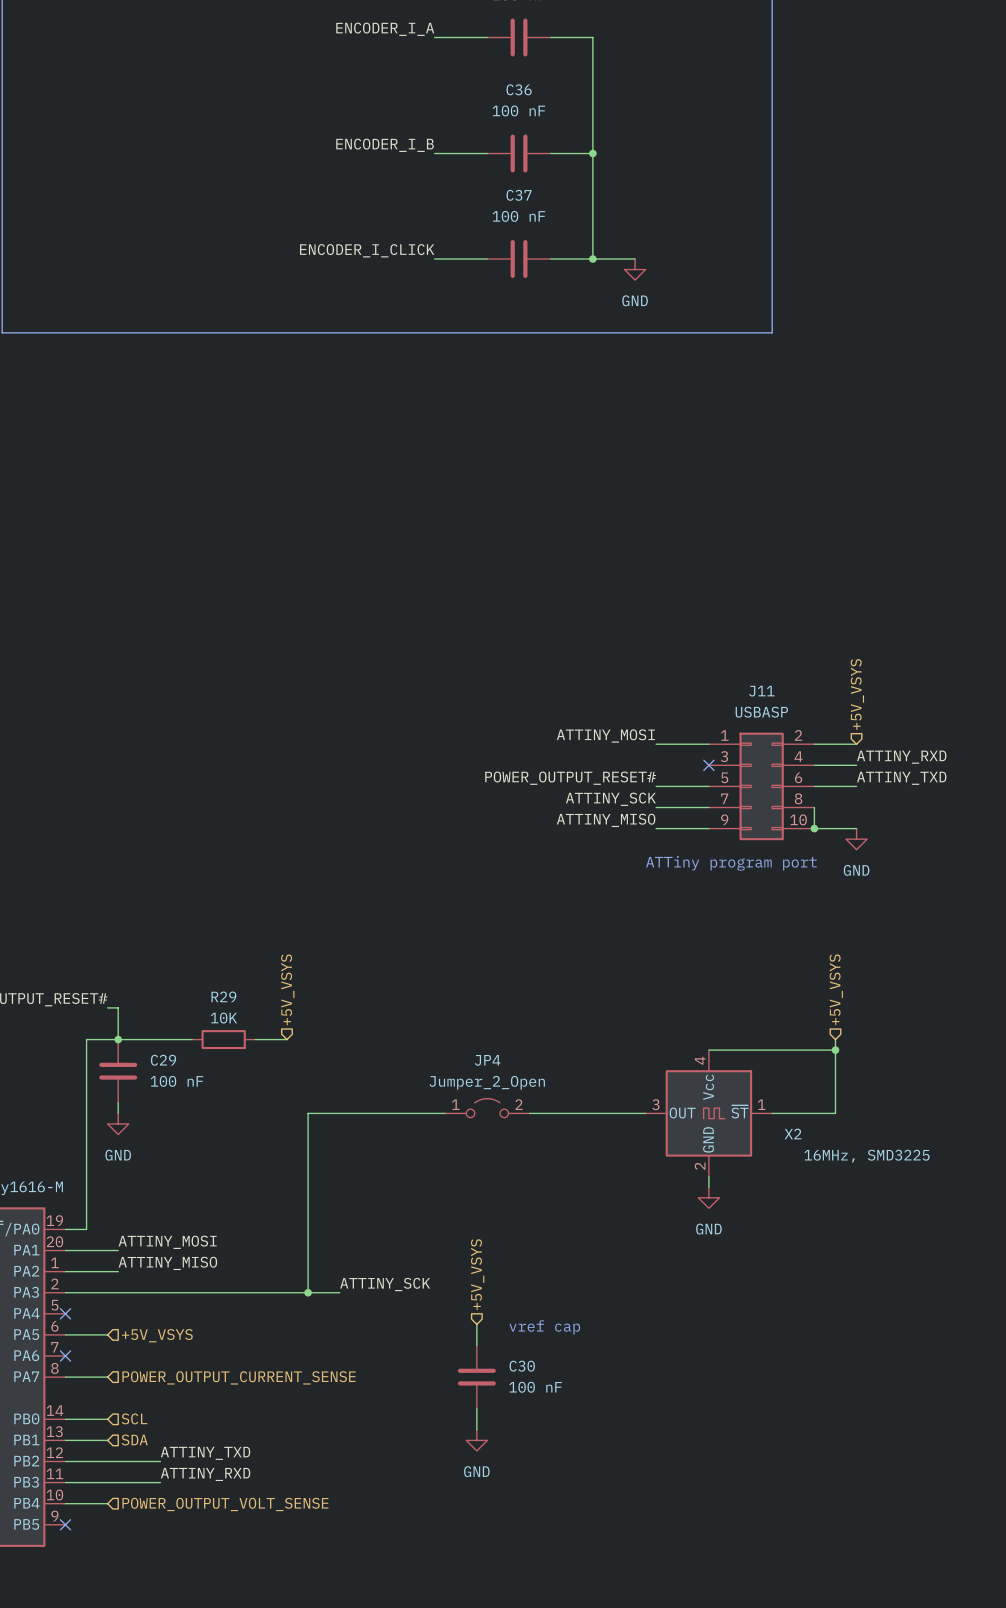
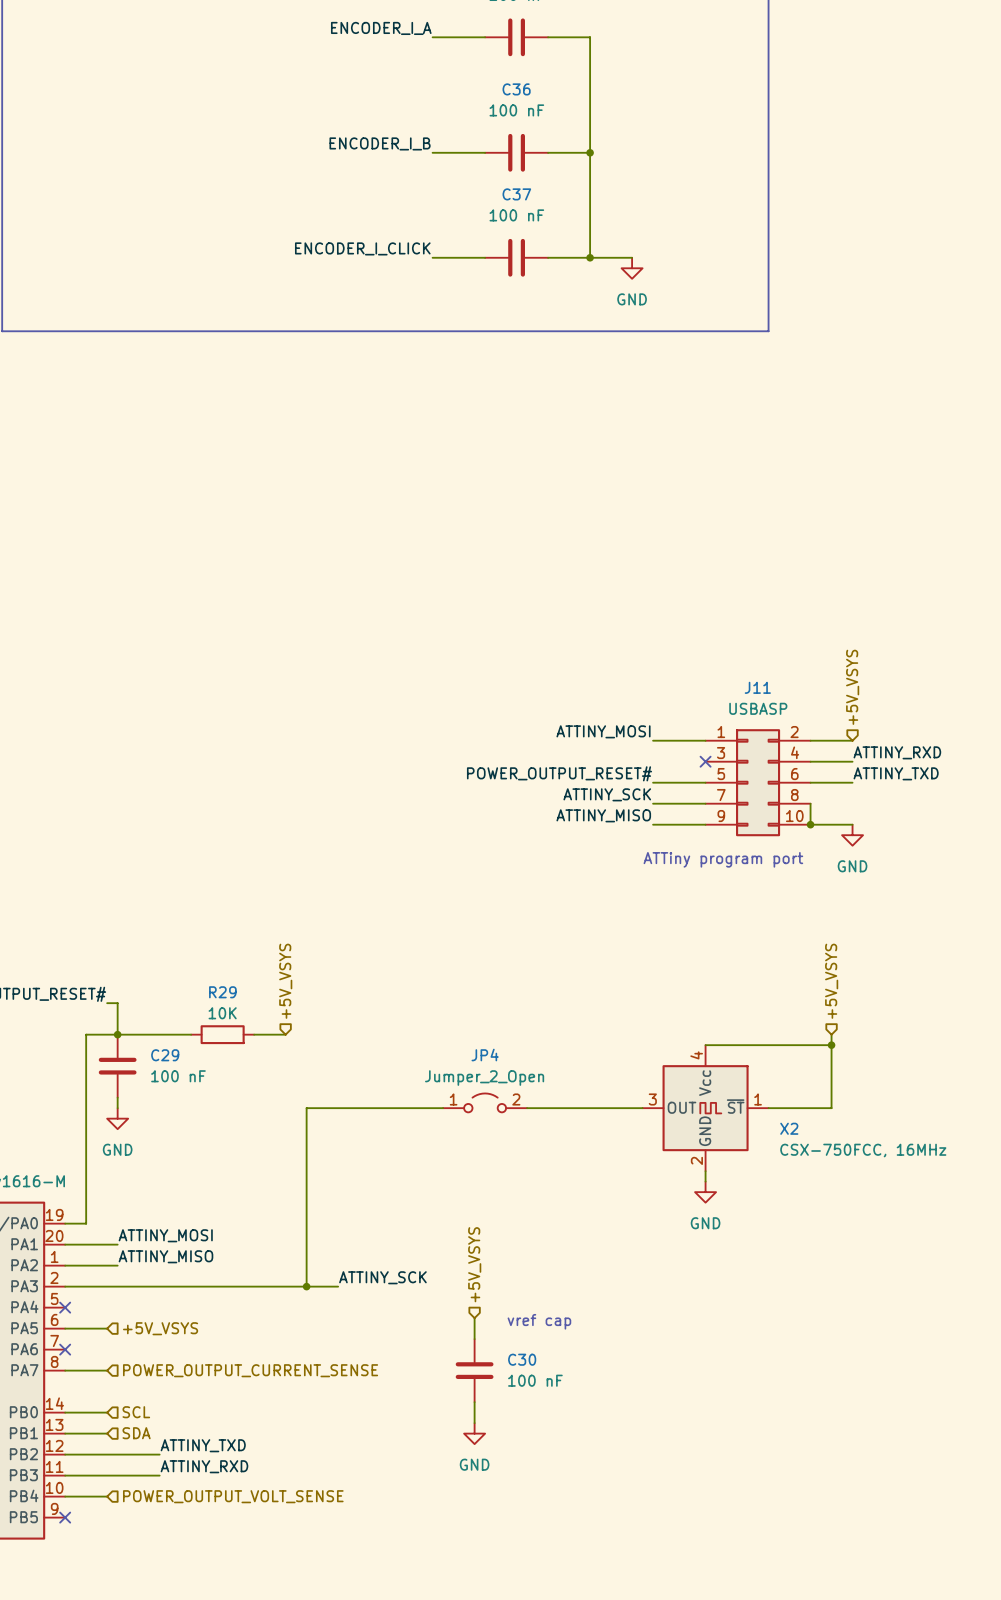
X2 value: 16MHz, SMD3225 (867, 1156) -> CSX-750FCC, 16MHz (863, 1150)

